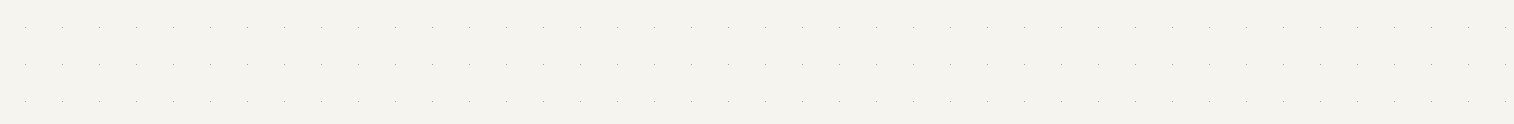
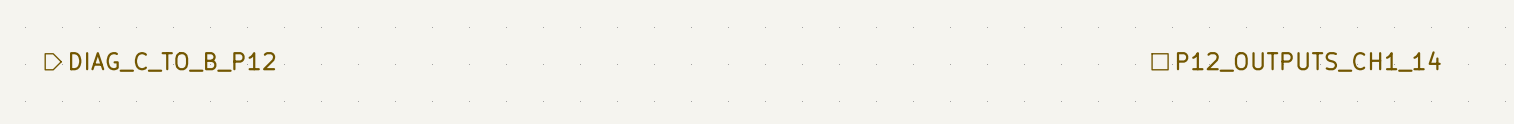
hierarchical label: none -> DIAG_C_TO_B_P12 (172, 61)
hierarchical label: none -> P12_OUTPUTS_CH1_14 (1308, 61)

